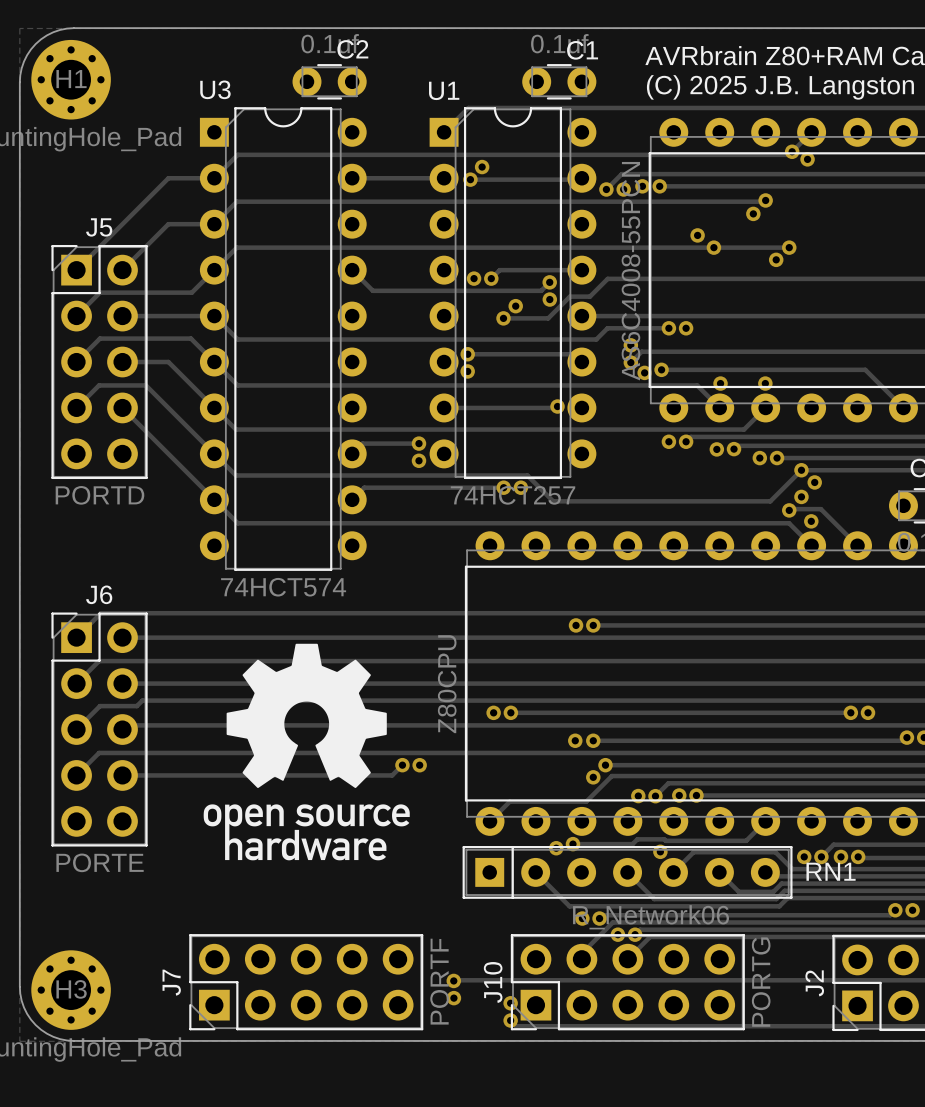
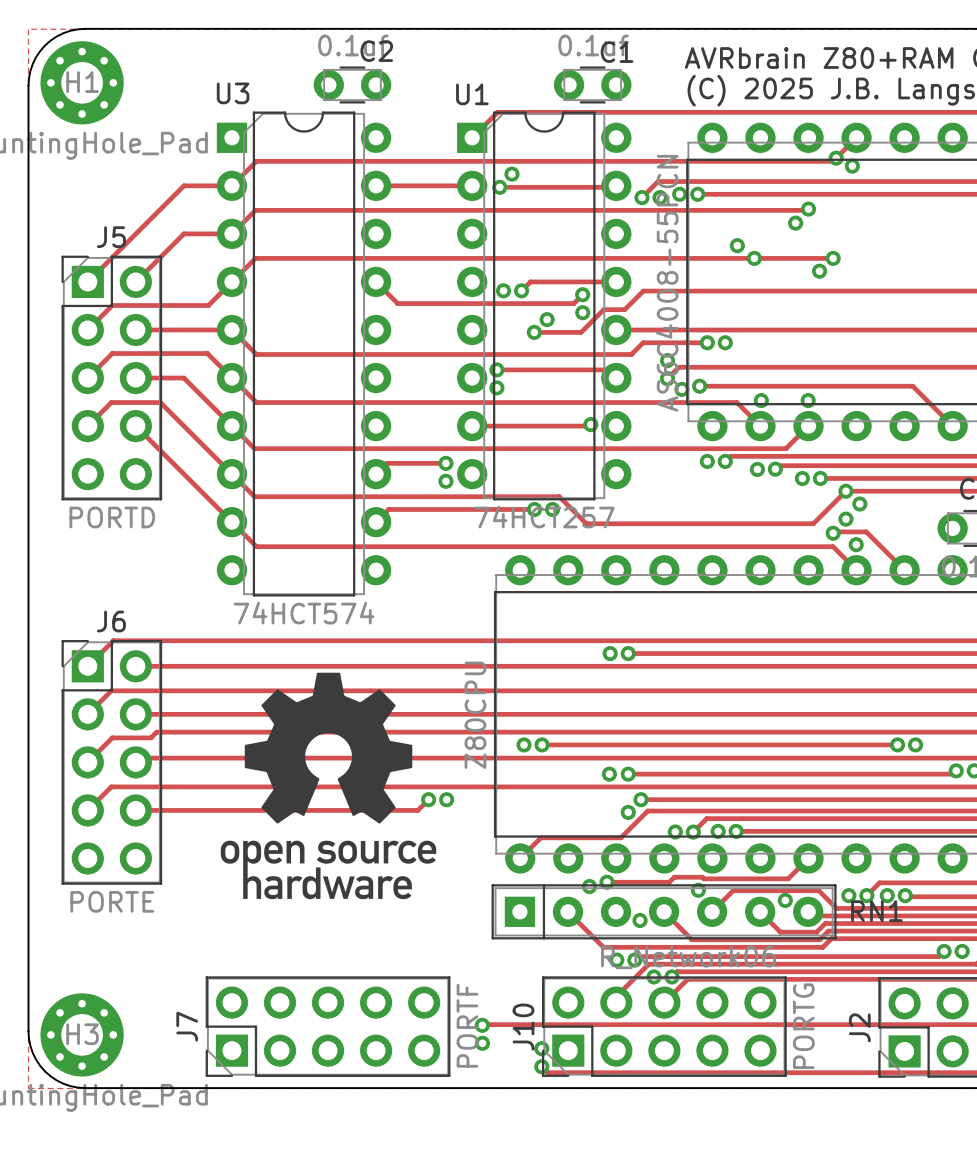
via: none -> (785, 900)
via: none -> (640, 920)

